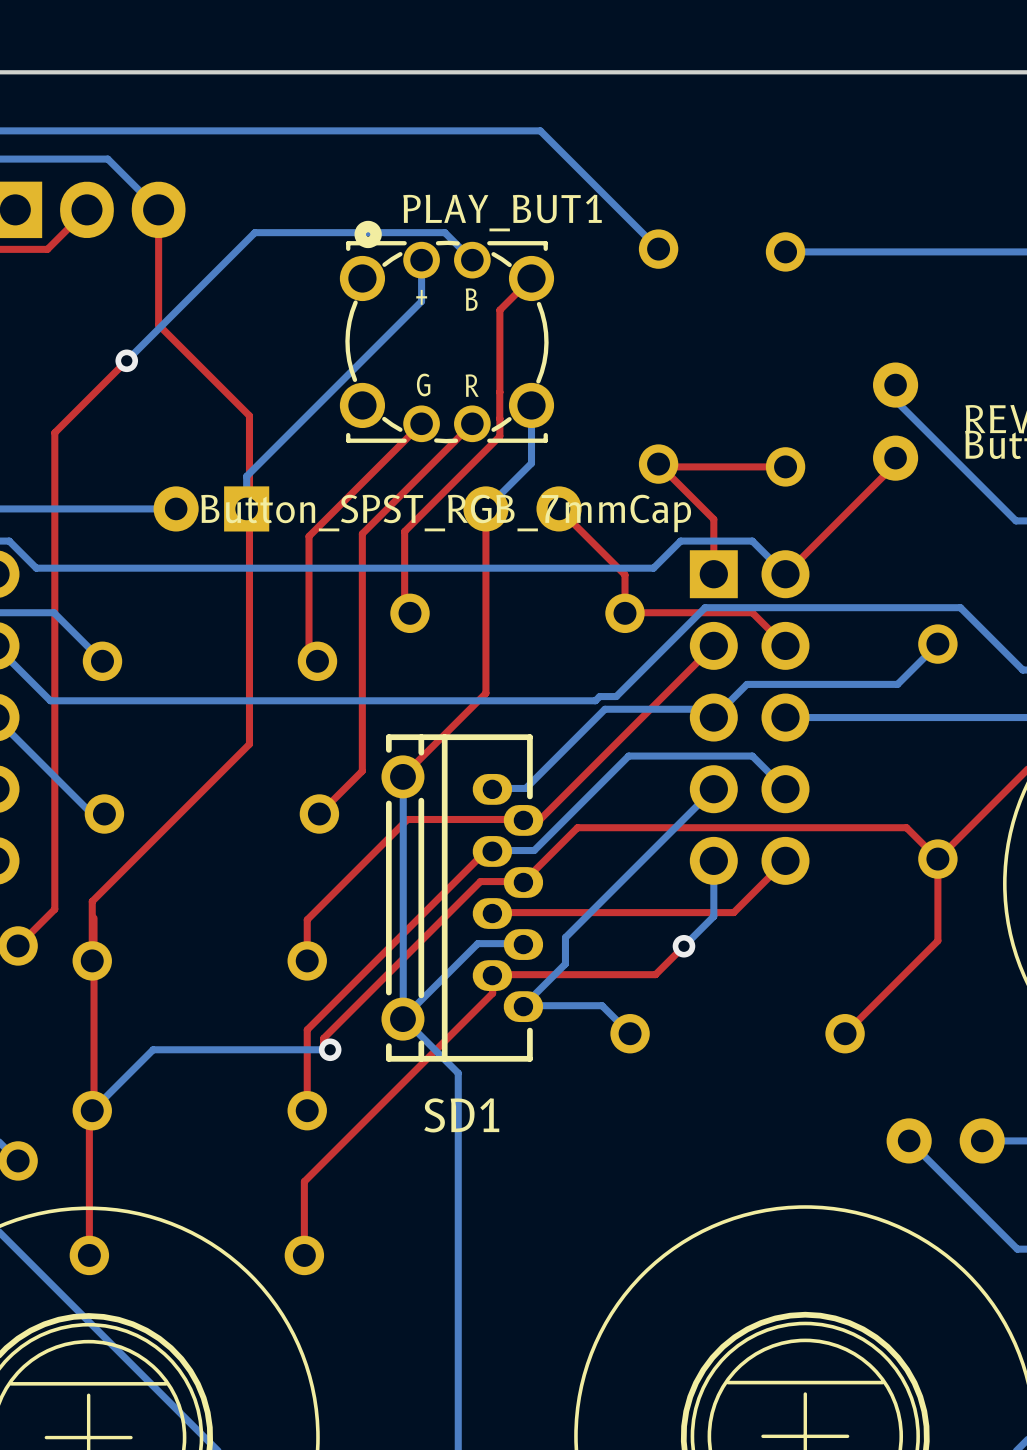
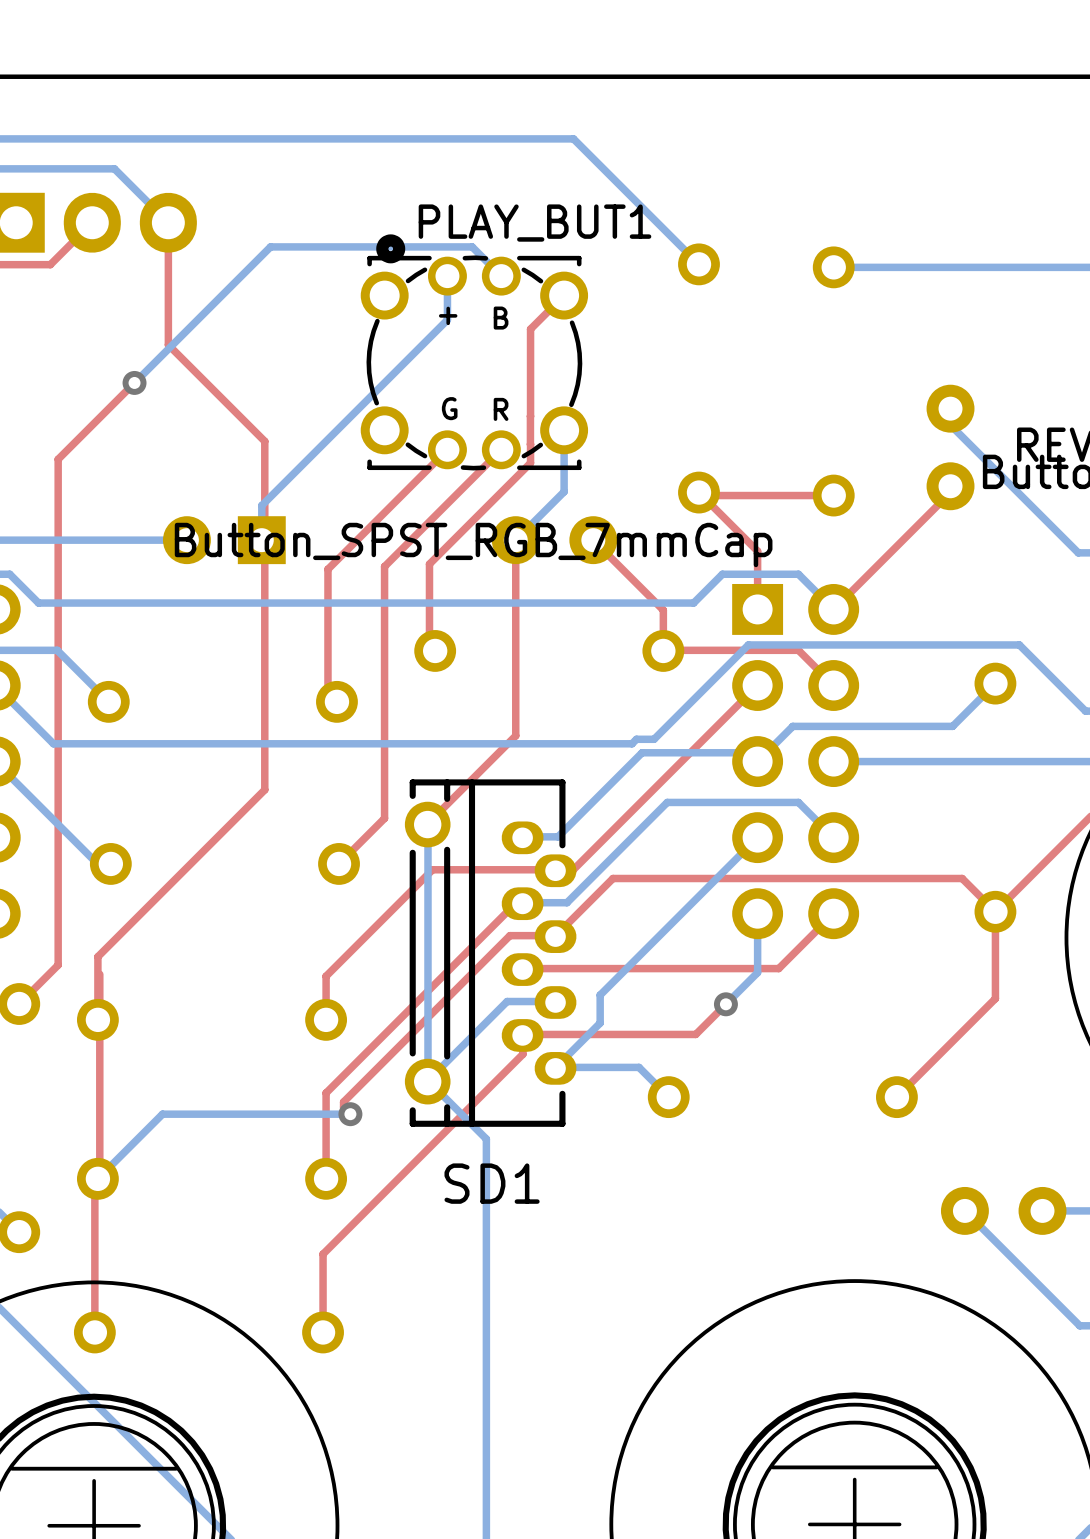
PLAY_BUT1 footprint: [339, 220, 555, 444] -> [360, 234, 589, 471]

